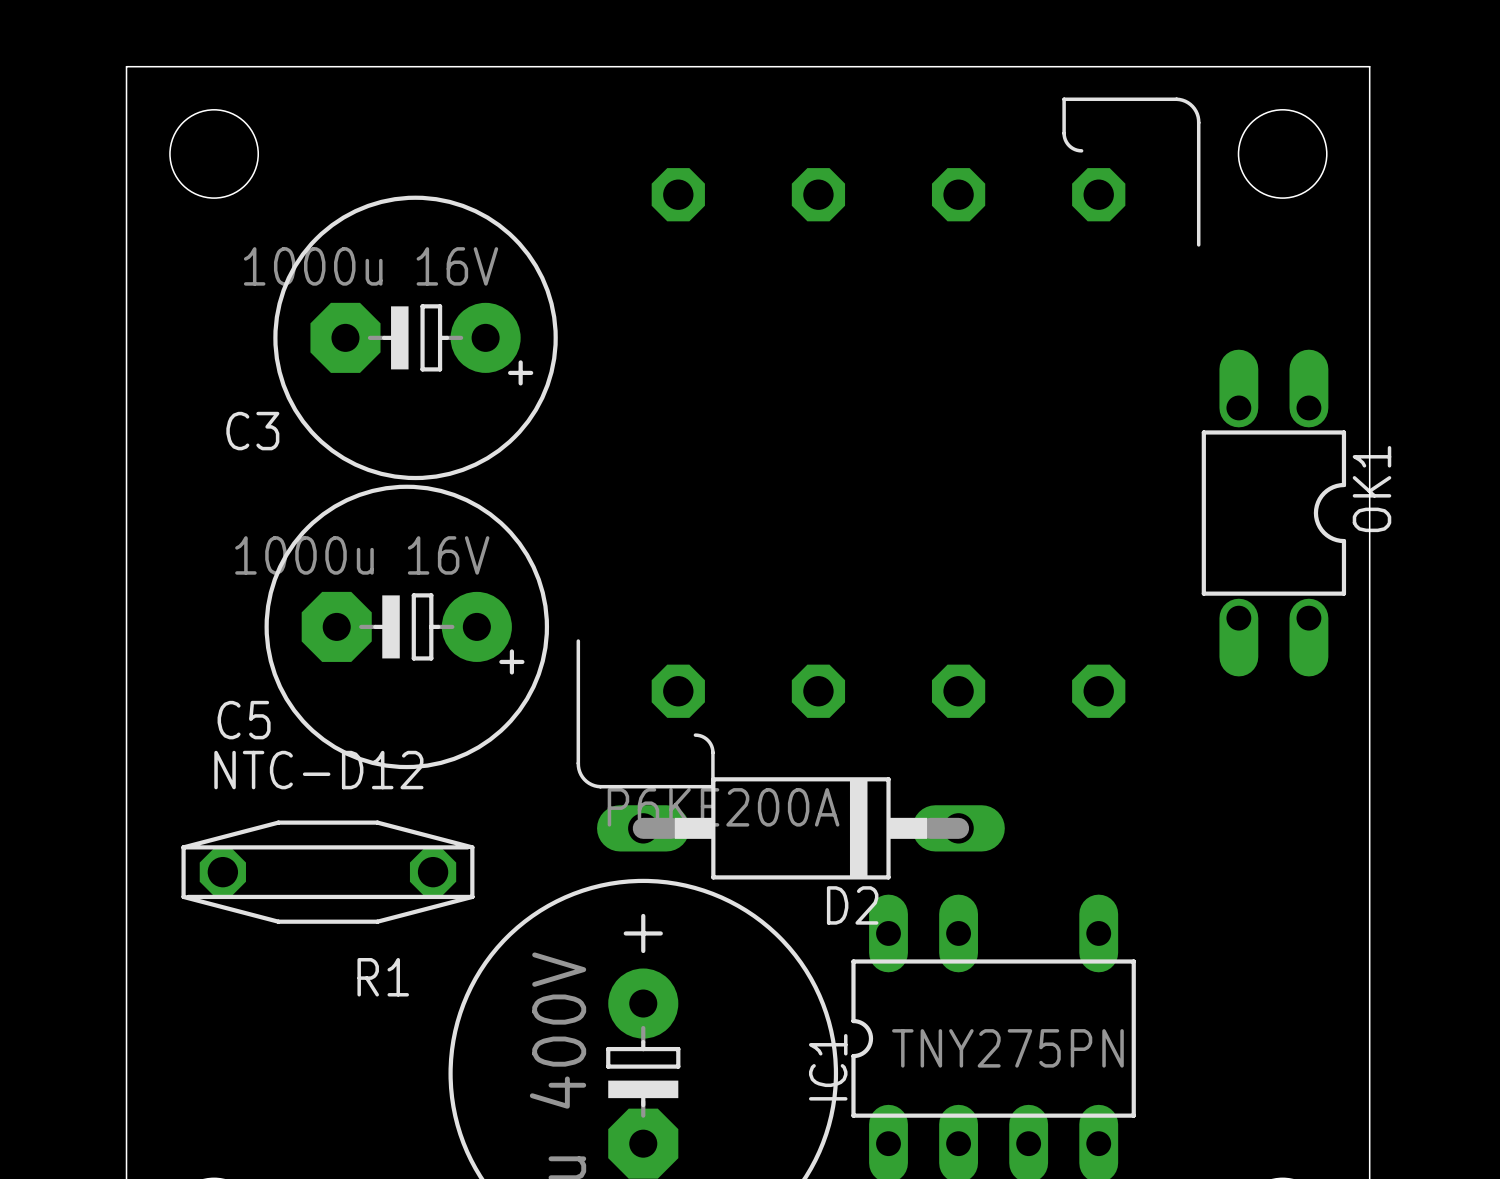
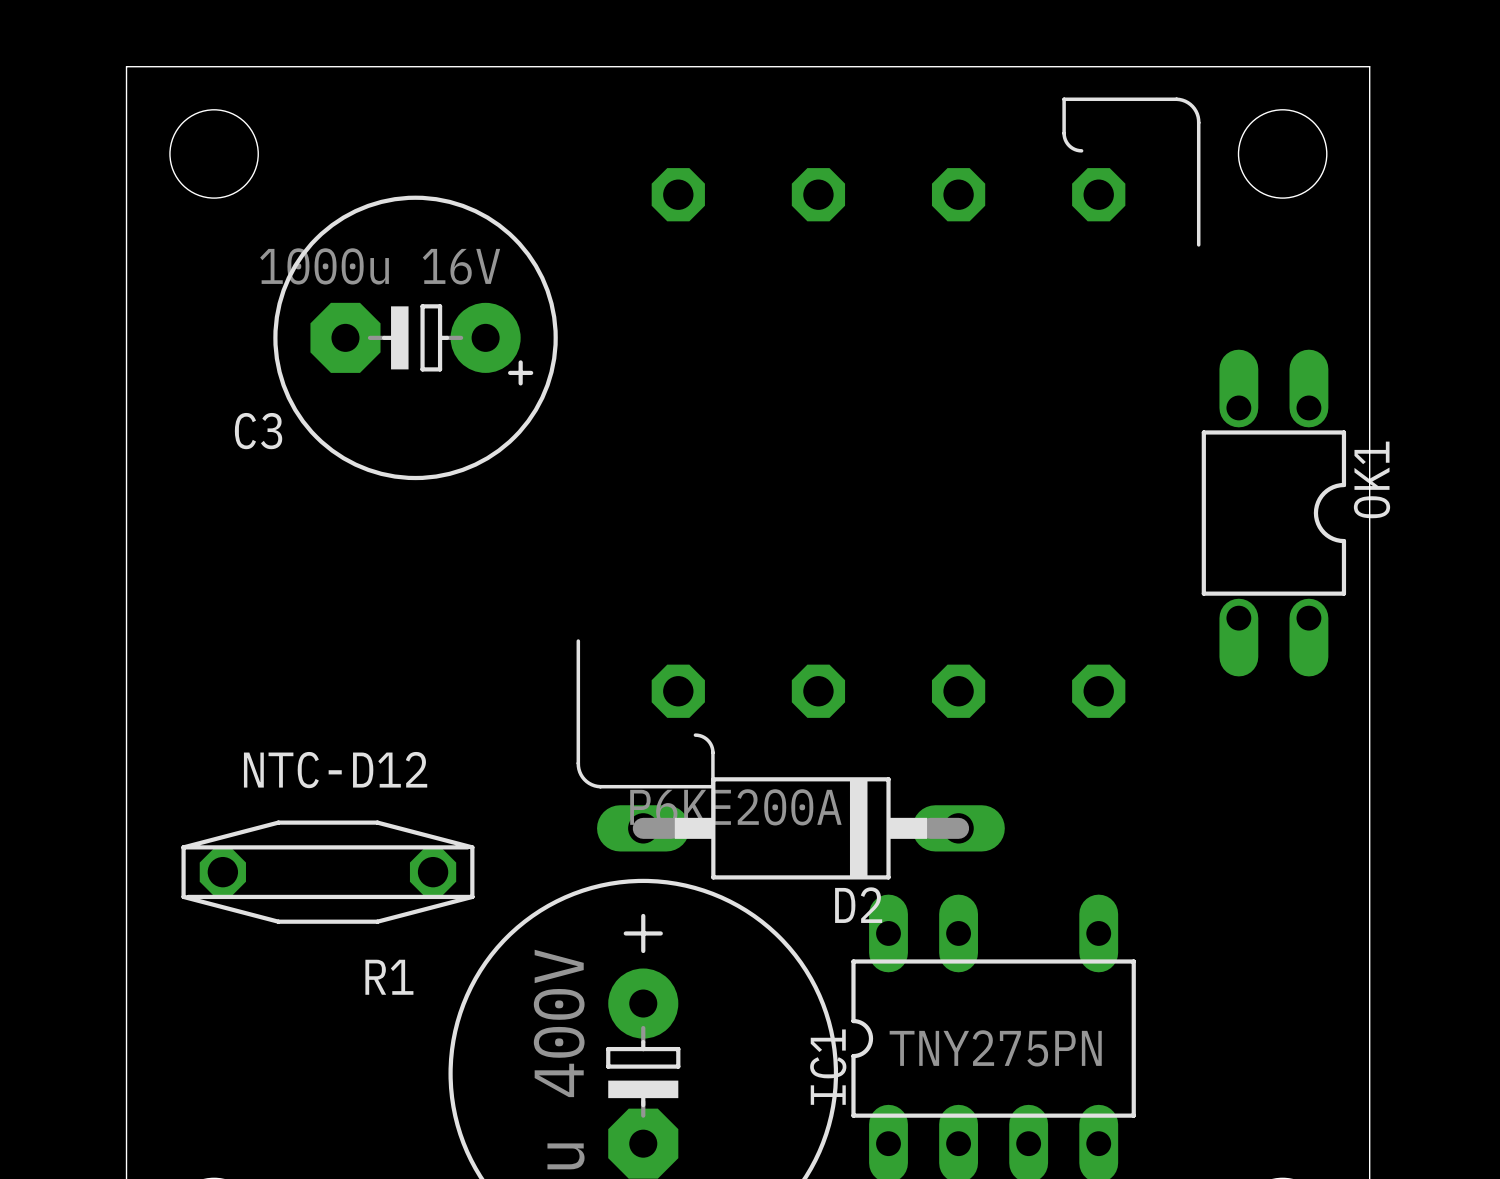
C5: 1000u 16V (406, 626) -> none

